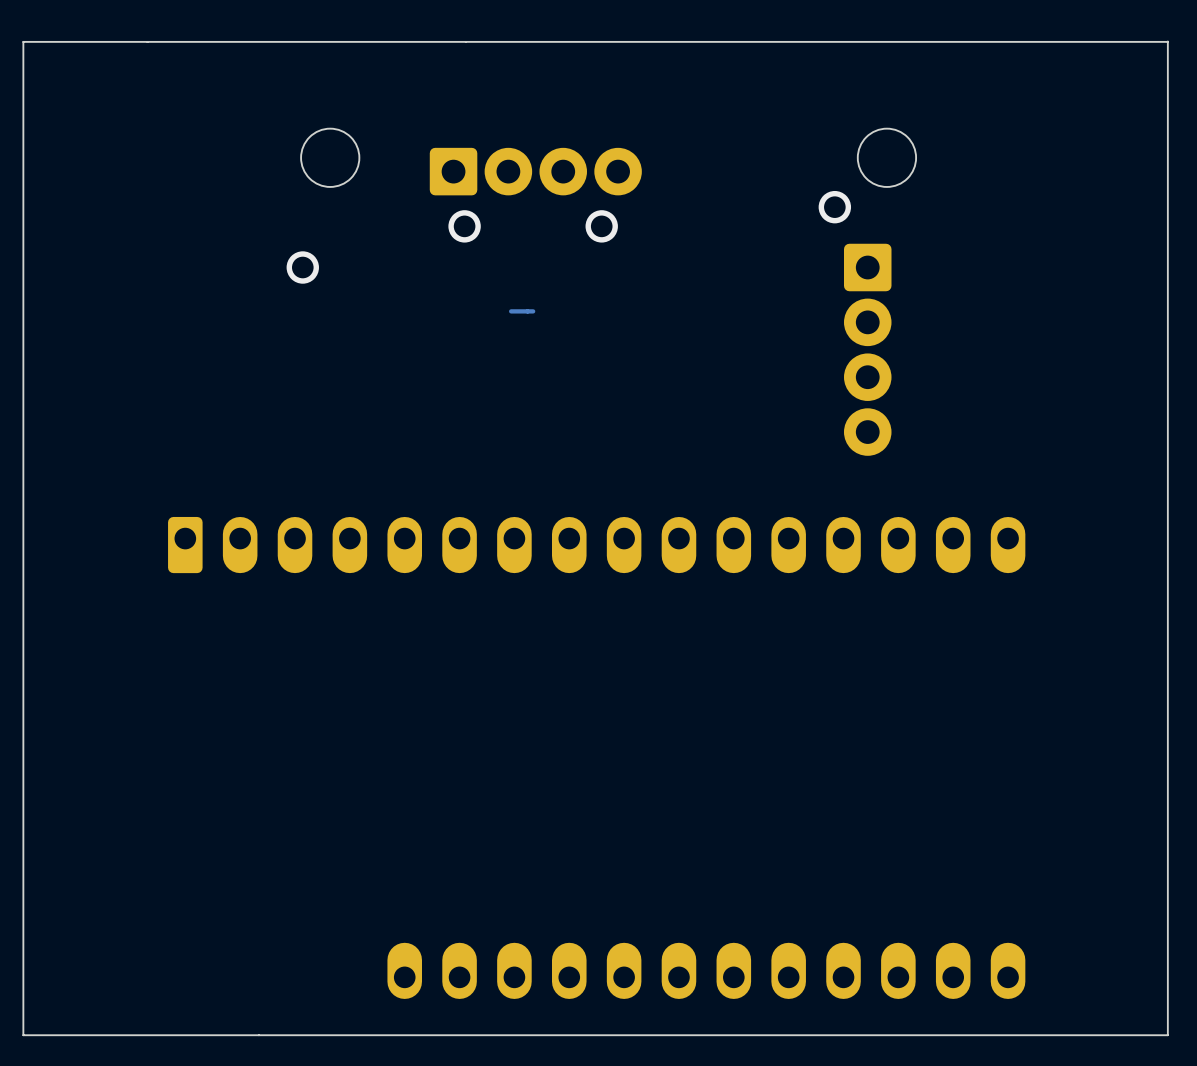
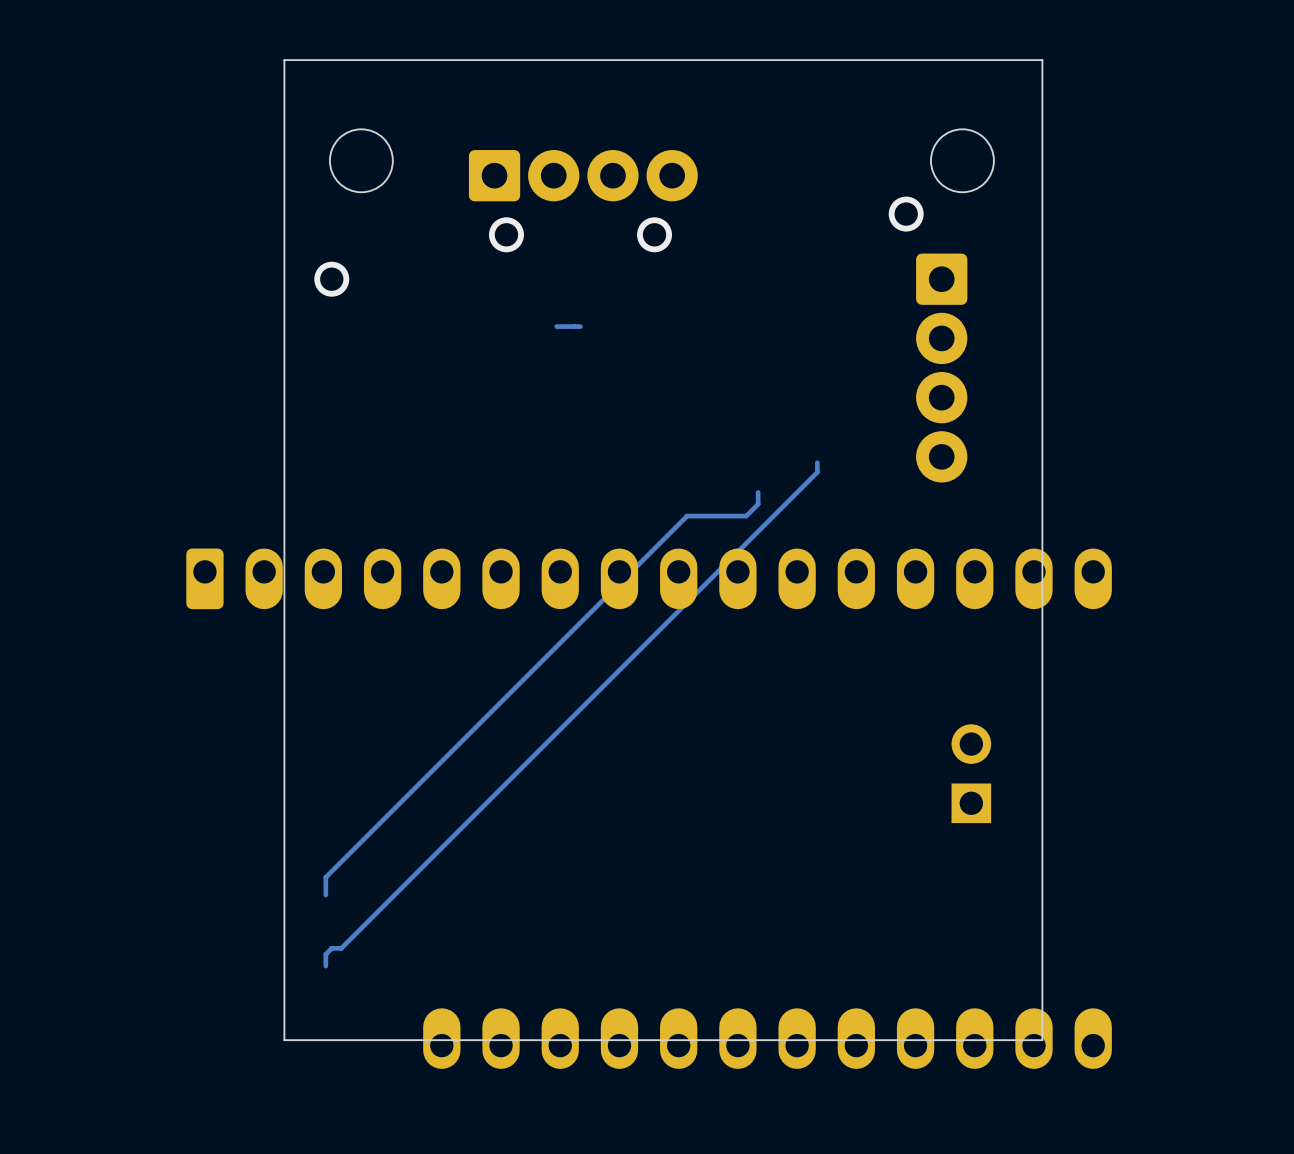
board edge: (1167, 41) (1167, 1035) (23, 1035) (23, 41) (1167, 41) -> (1042, 60) (1042, 1040) (284, 1040) (284, 60) (1042, 60)
track: none -> (817, 462) (817, 472) (341, 948) (331, 948) (325, 954) (325, 966)
track: none -> (758, 492) (758, 504) (746, 516) (687, 516) (325, 877) (325, 895)
part: none -> (971, 773)

